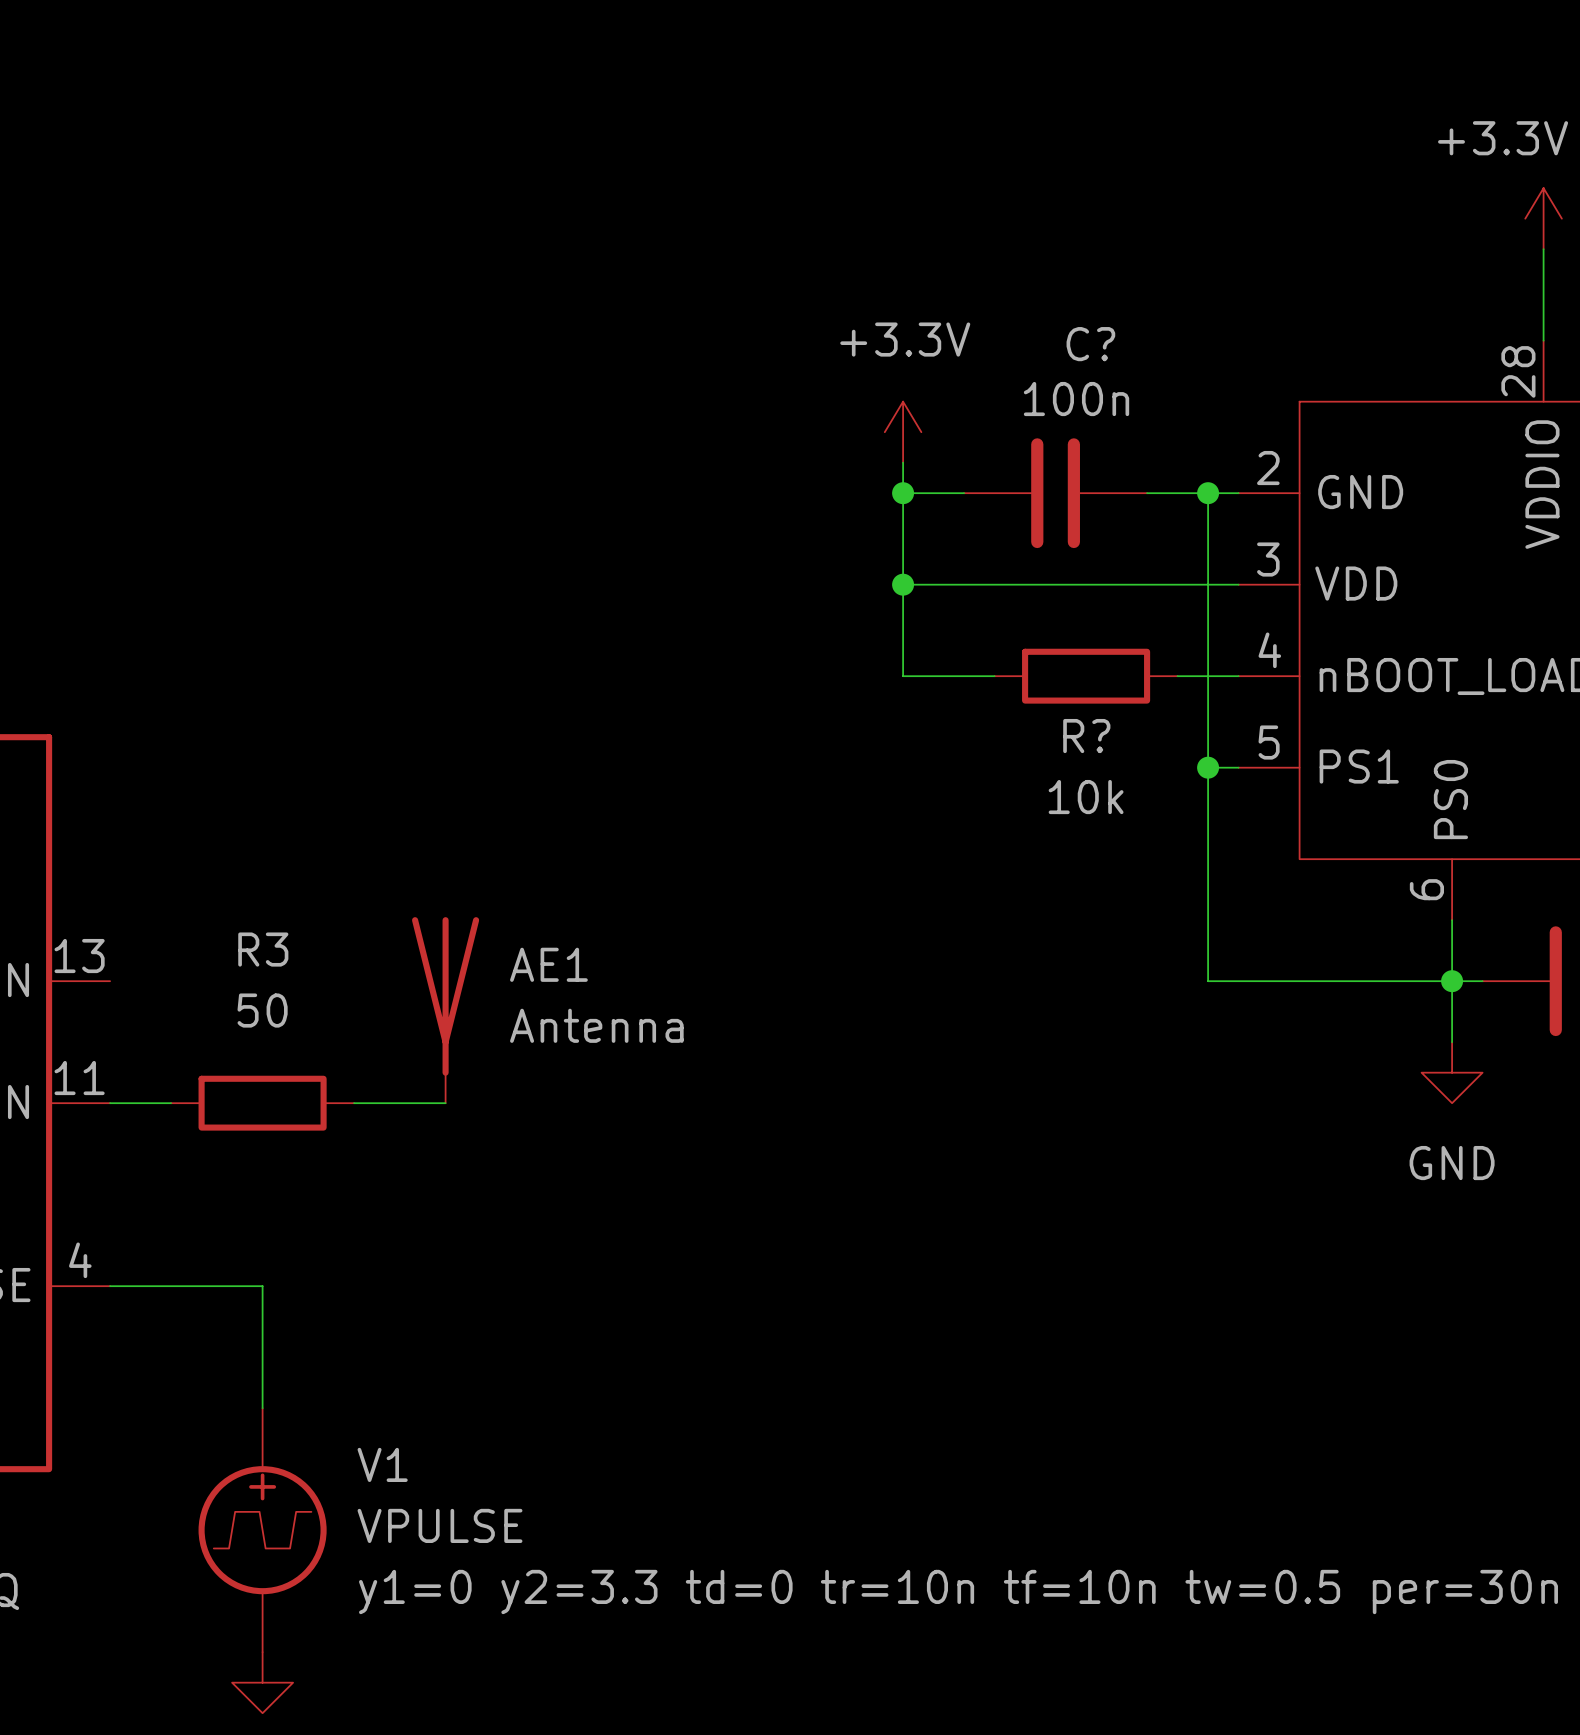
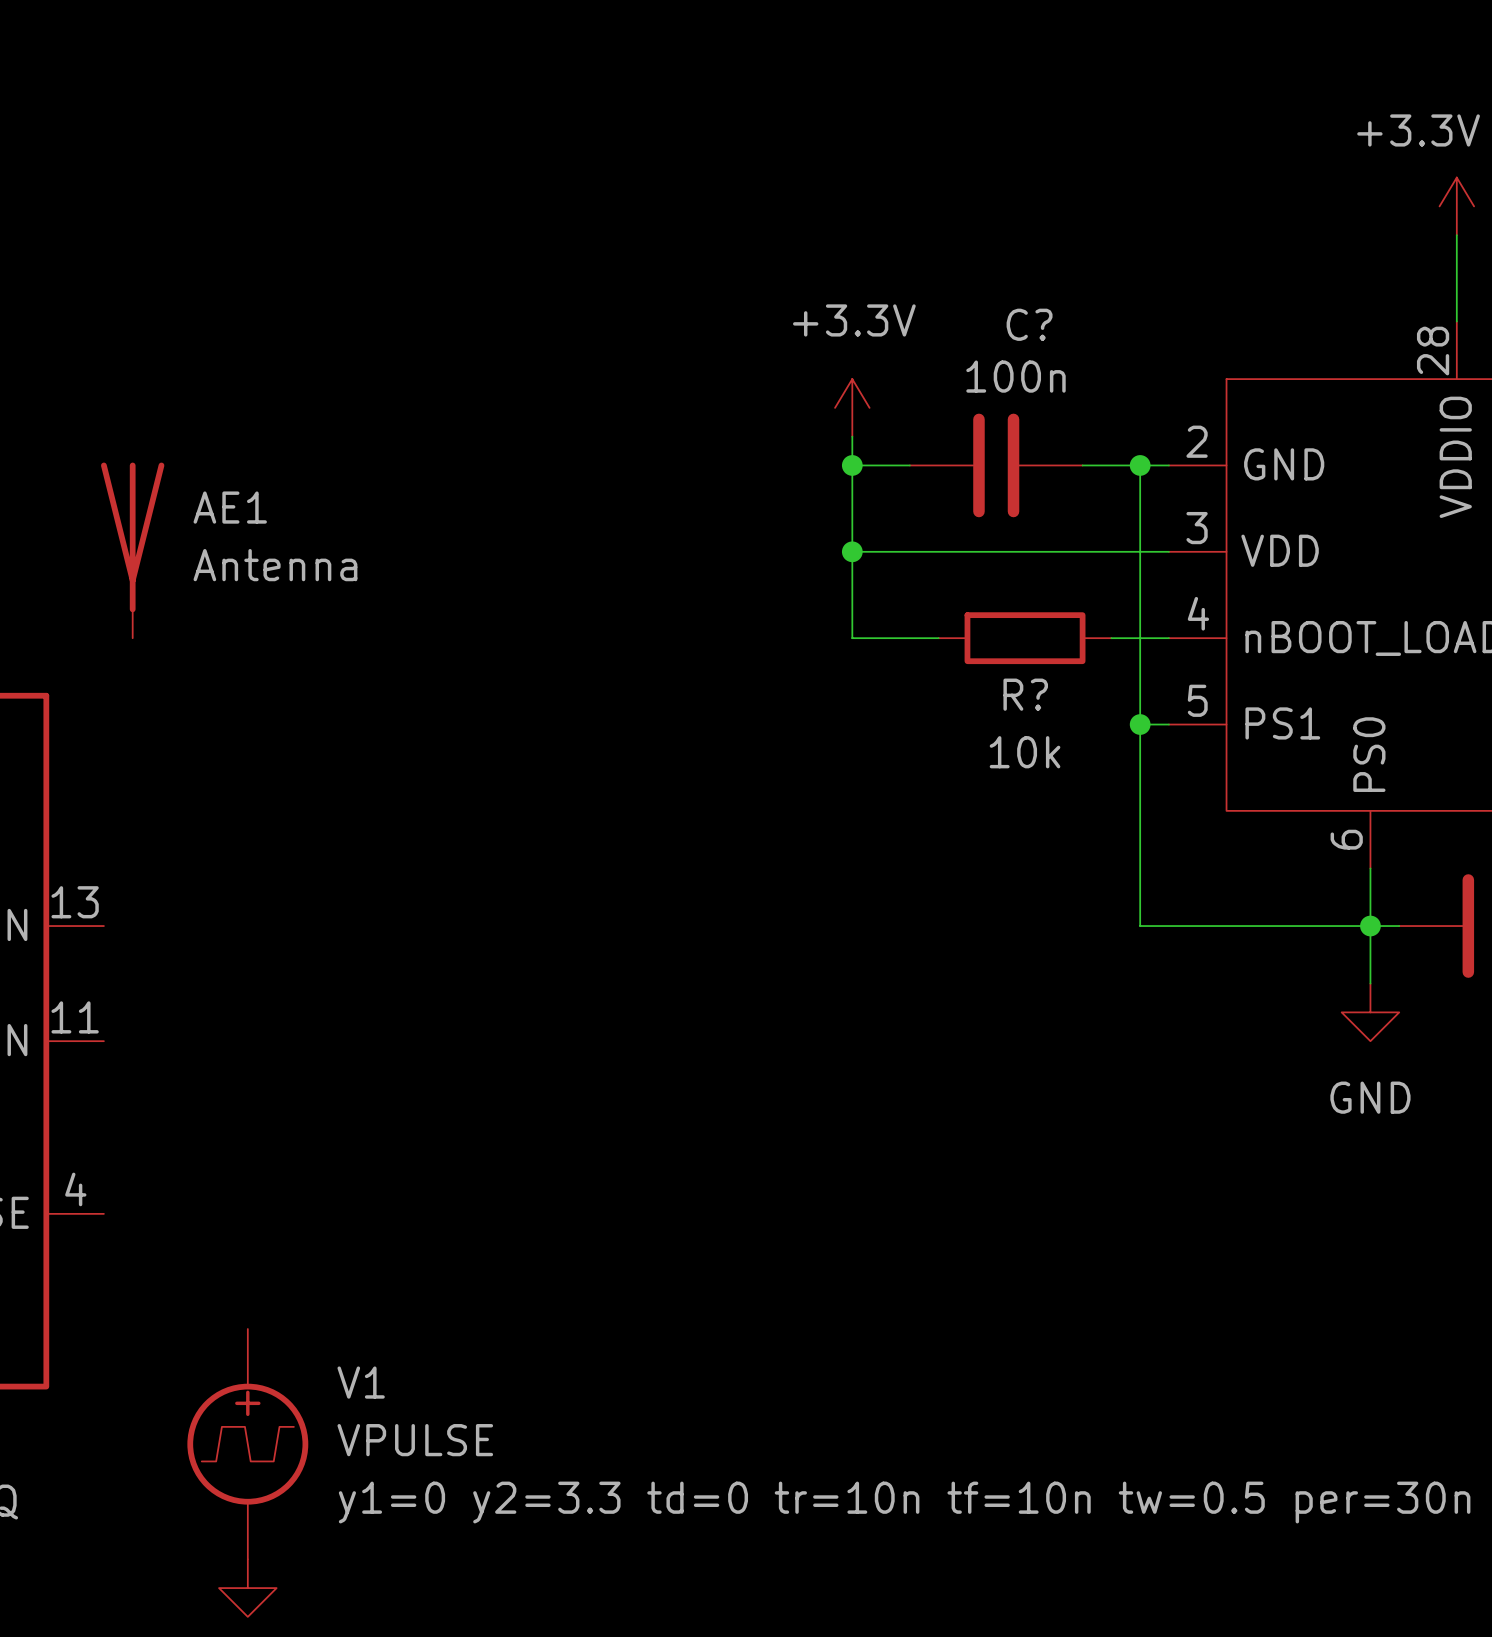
AE1 position: (445, 1010) -> (132, 550)
wire: (110, 1103) (171, 1103) -> none
R3: 50 (262, 1103) -> none
wire: (354, 1103) (445, 1103) -> none
wire: (110, 1286) (262, 1286) (262, 1408) -> none

